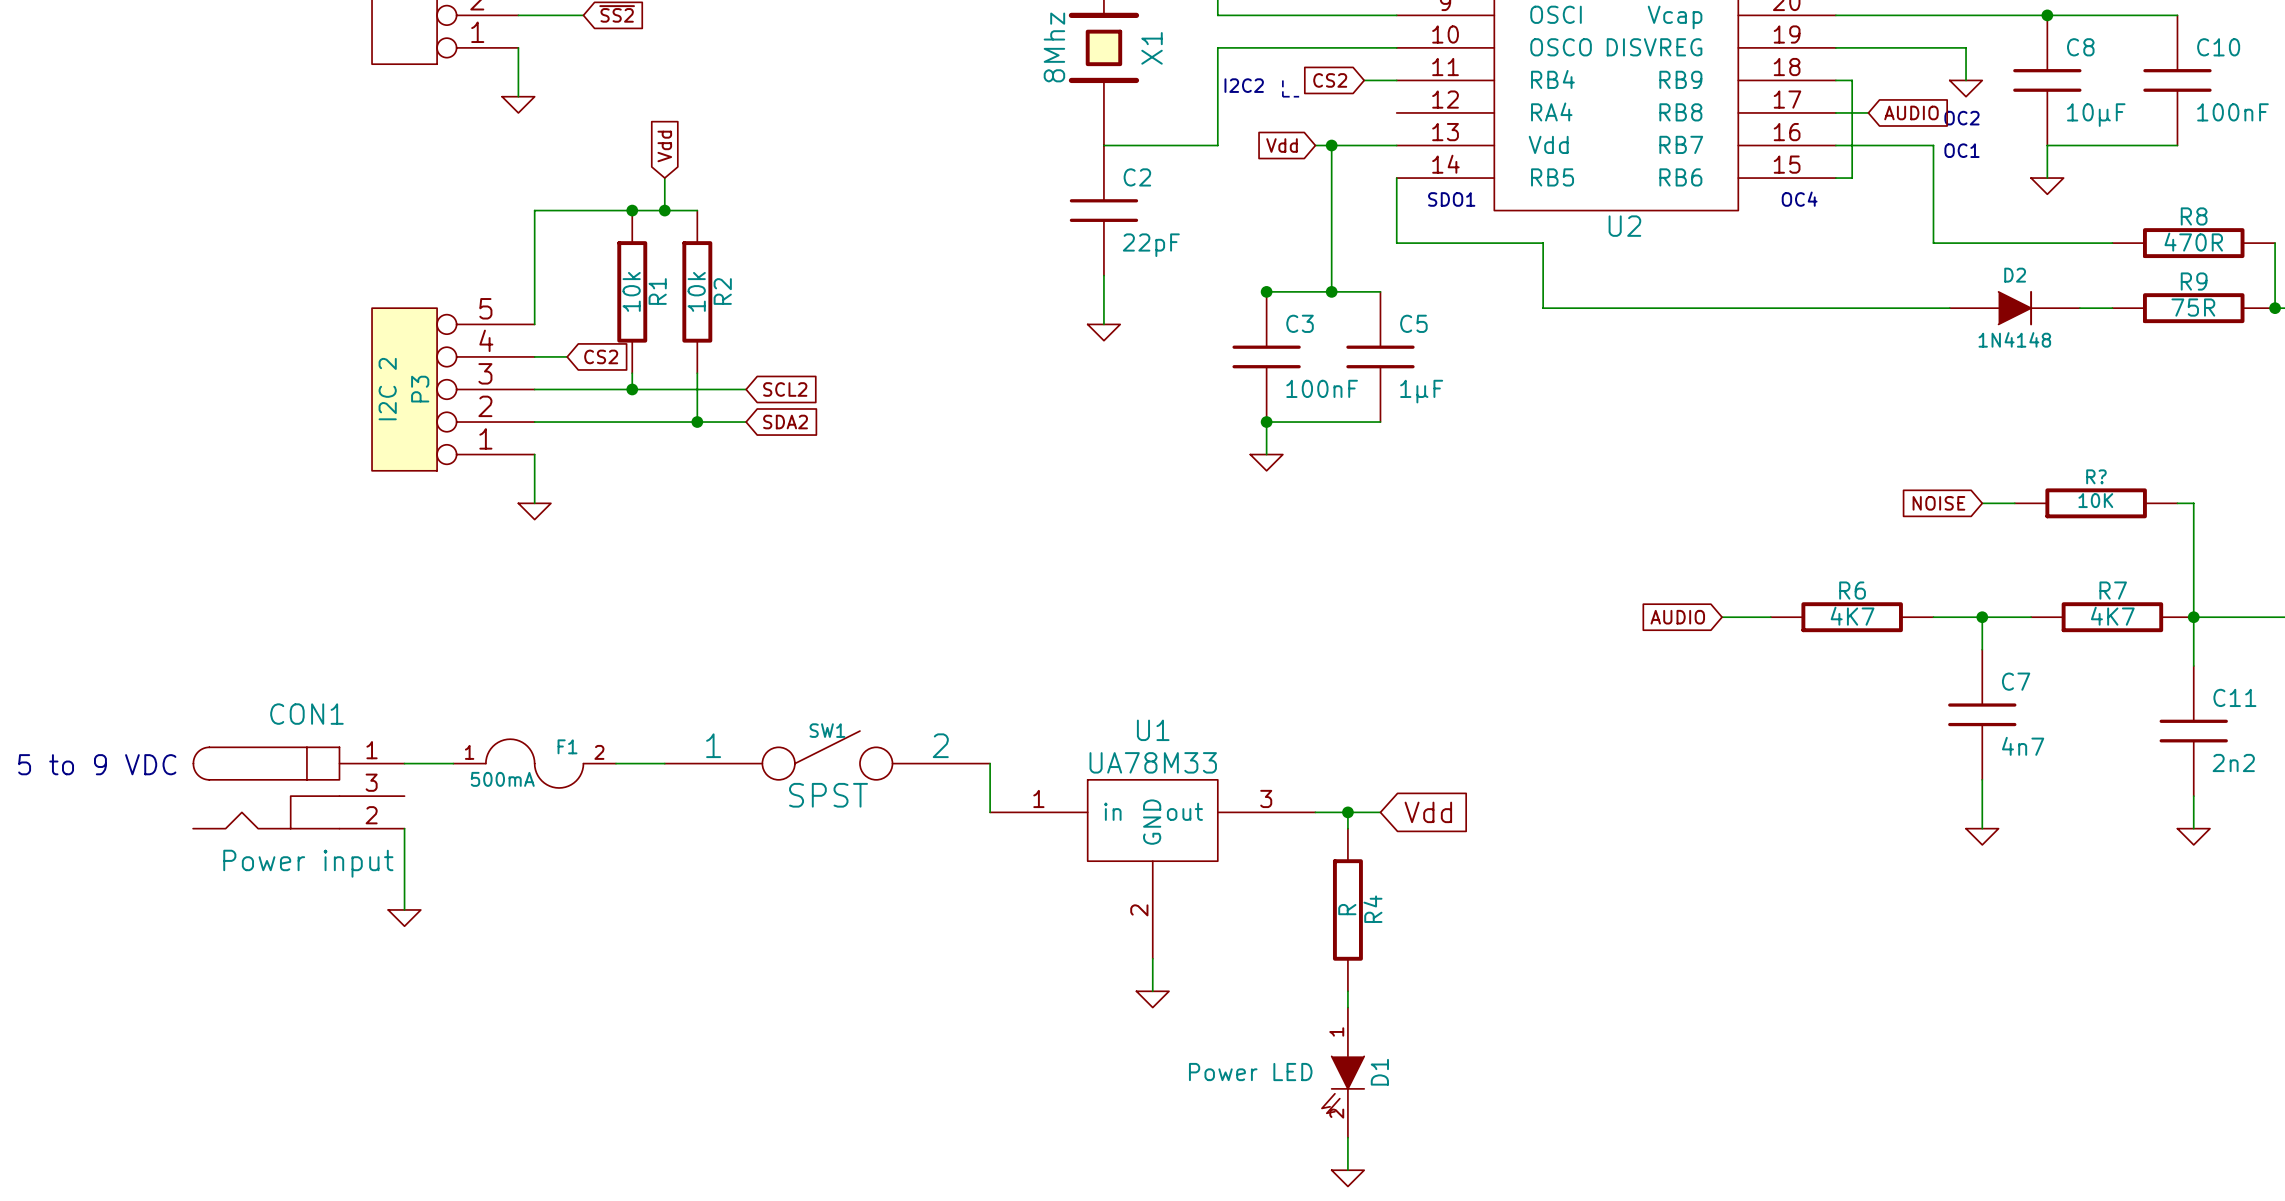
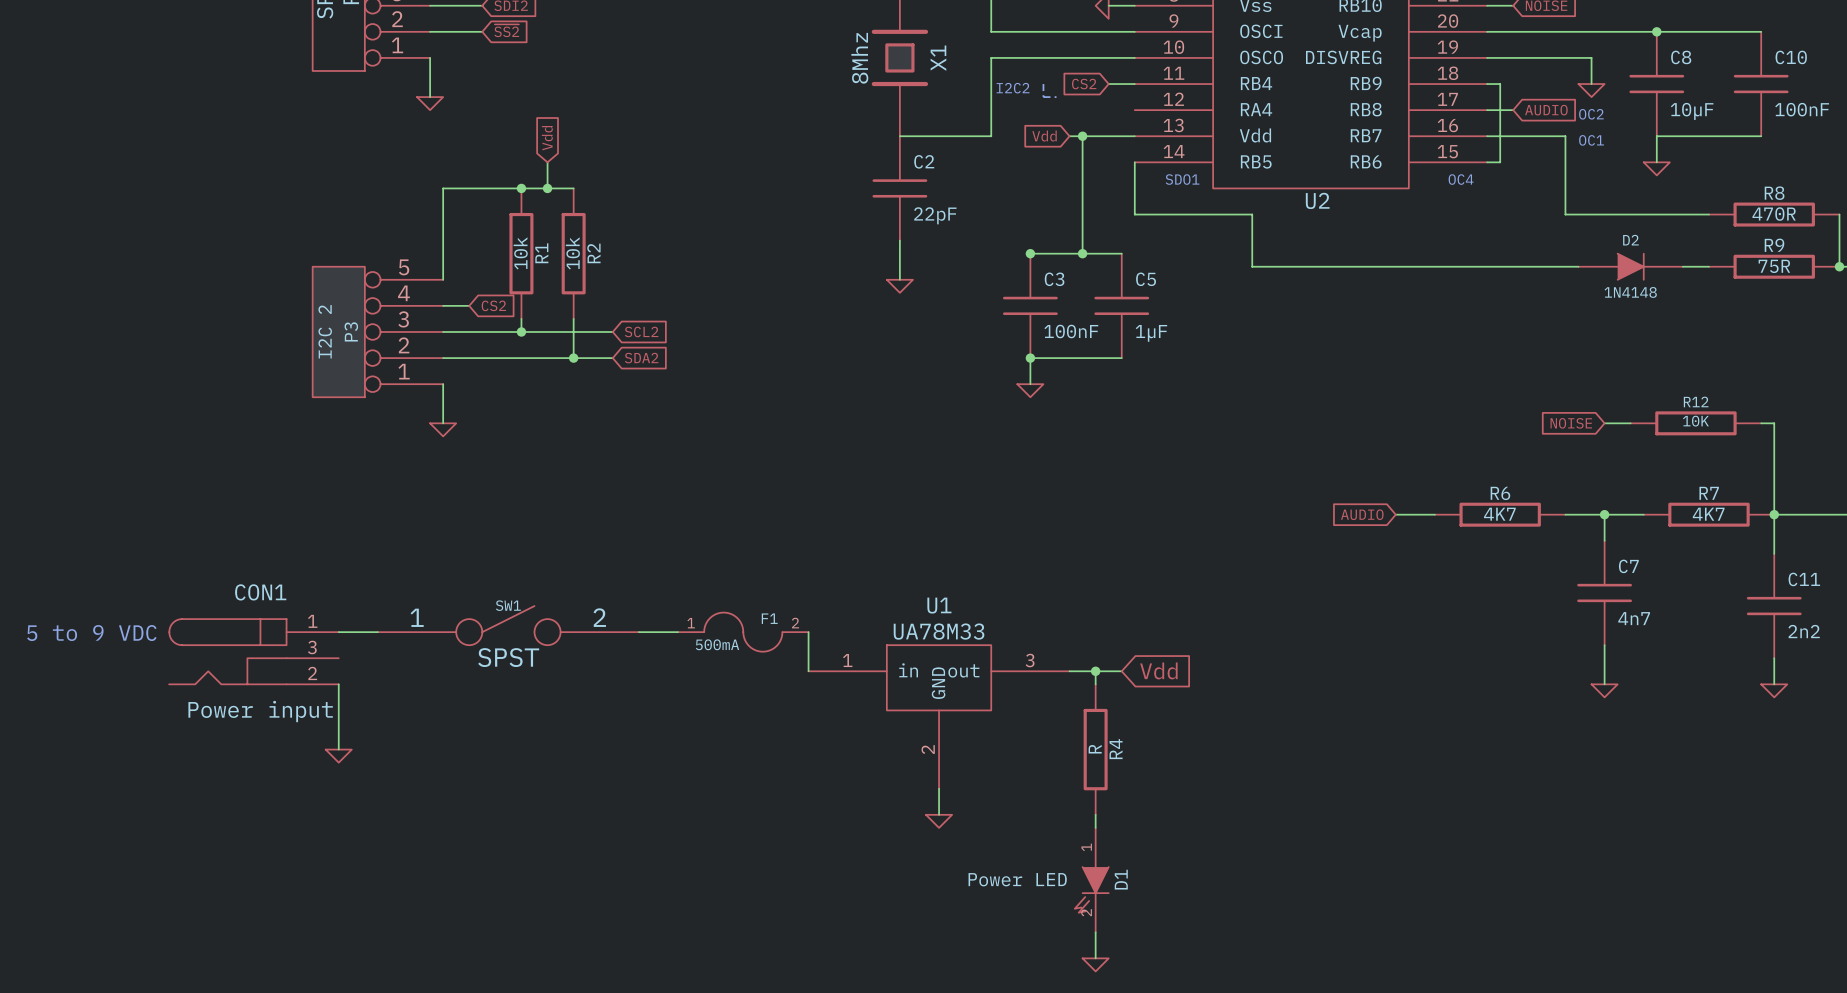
R? name: R? (2096, 476) -> R12 (1696, 401)
SW1 position: (827, 755) -> (508, 625)
F1 position: (534, 763) -> (743, 632)
wire: (615, 763) (664, 763) -> (638, 632) (678, 632)

